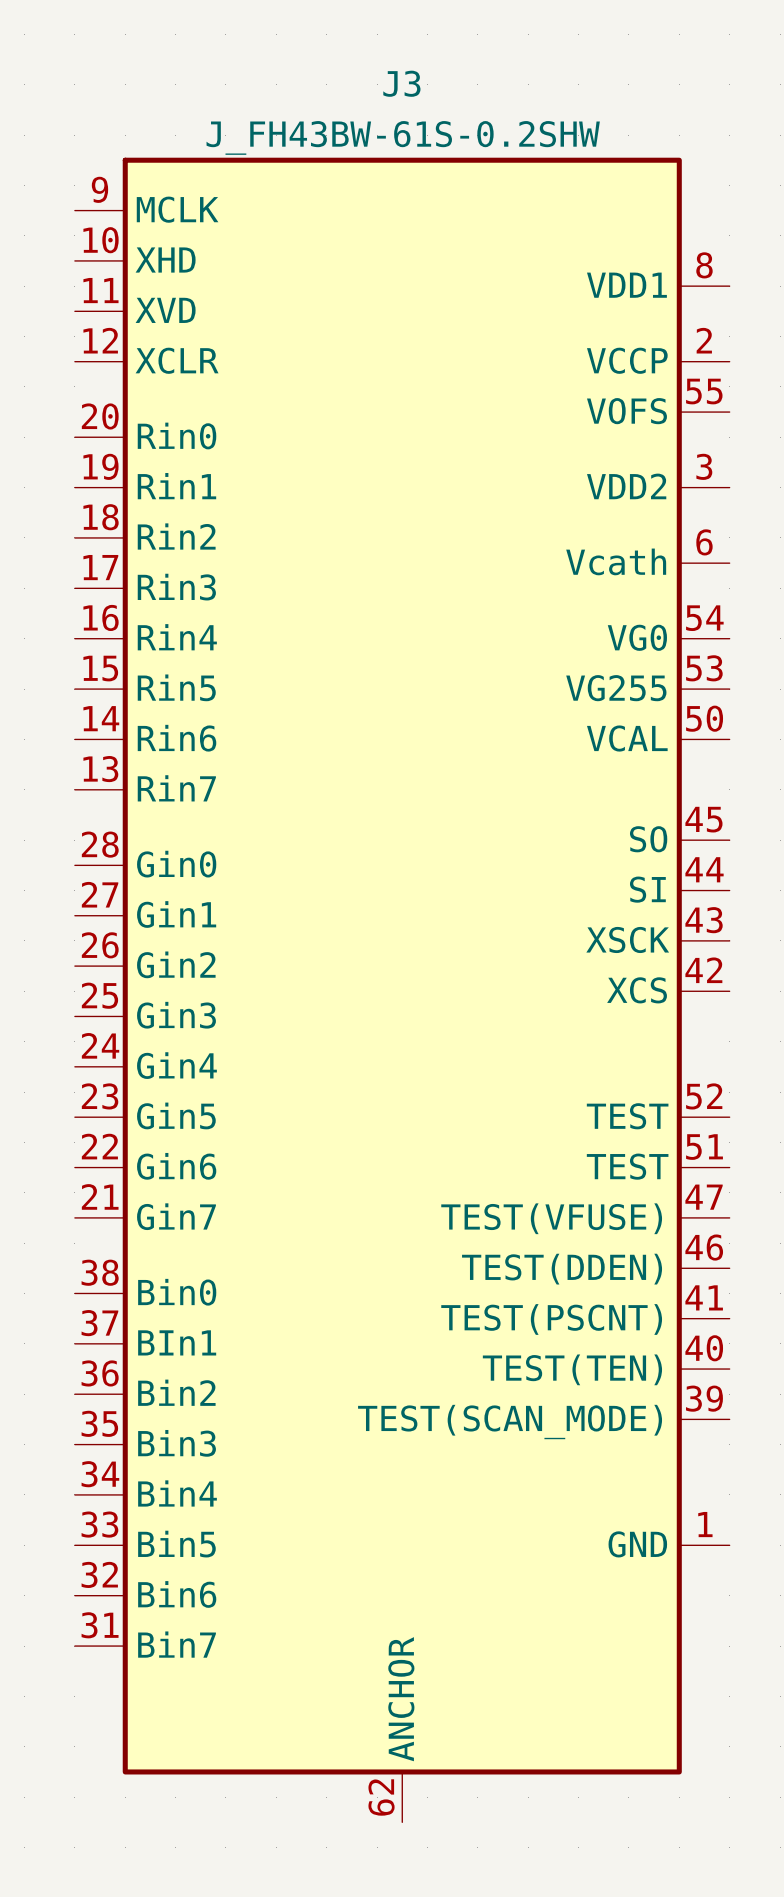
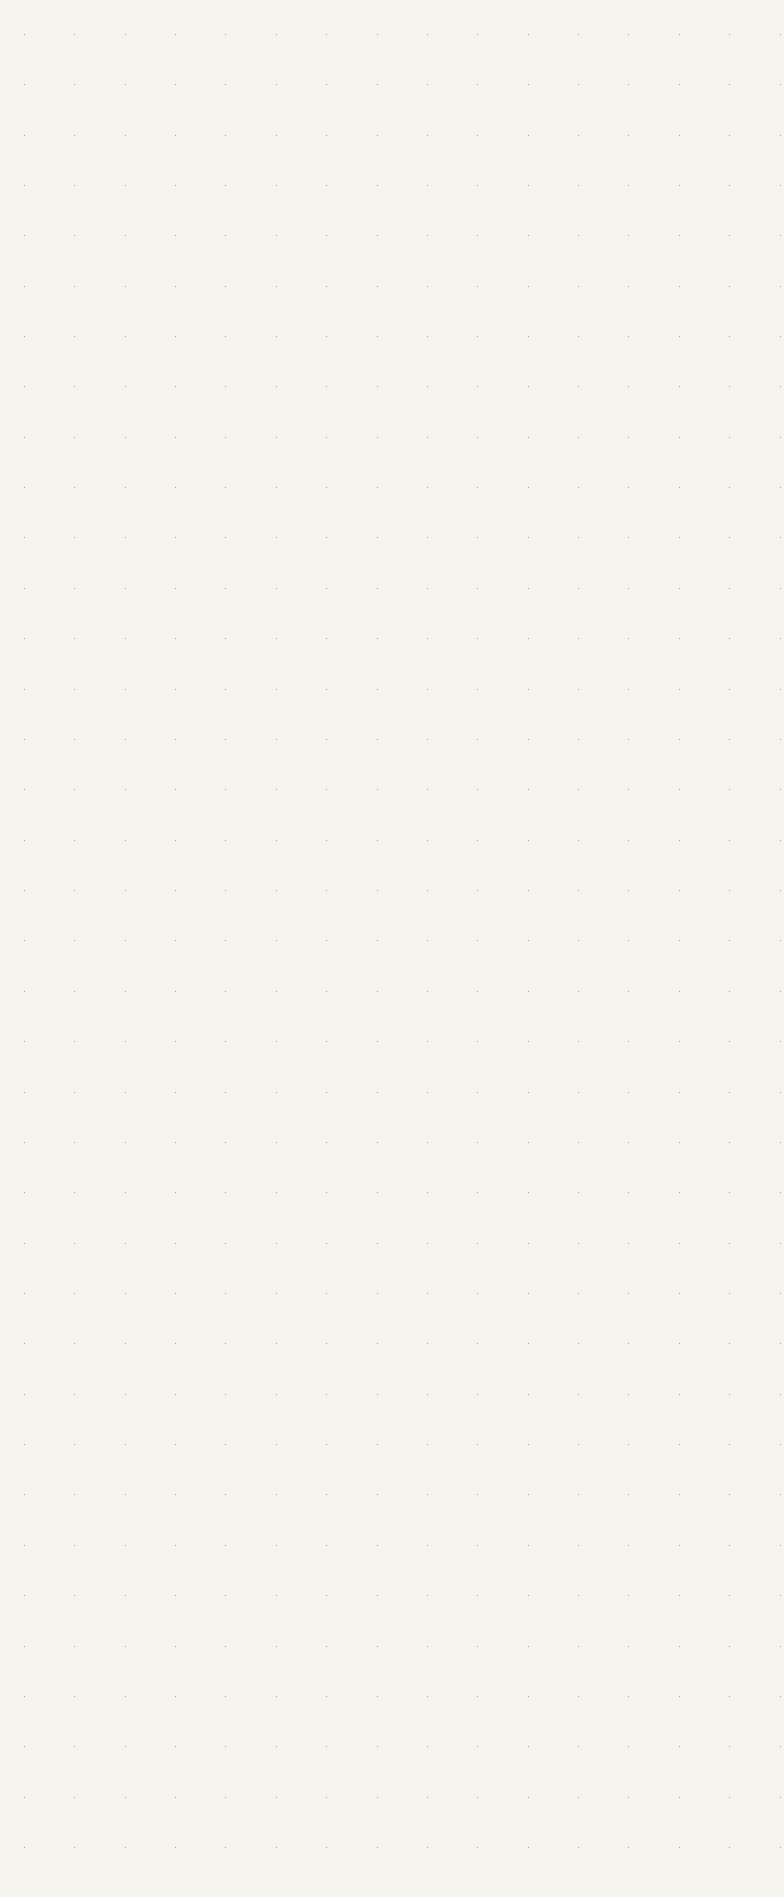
J3: (402, 990) -> none

